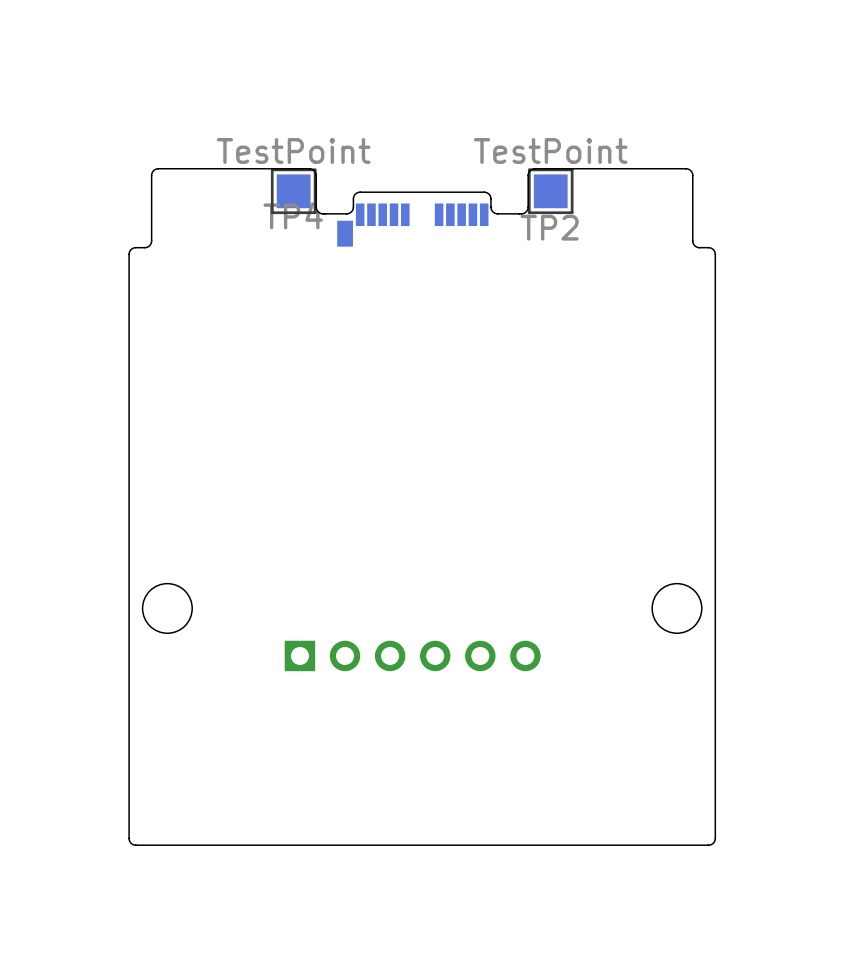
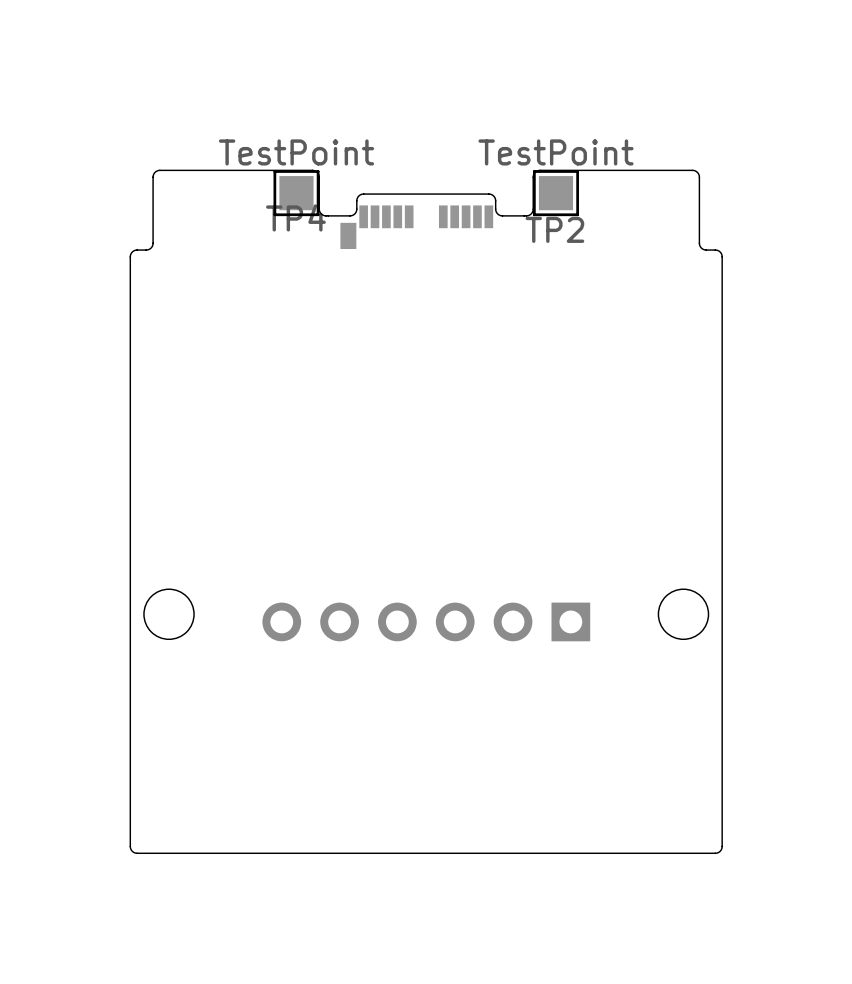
part: none -> (426, 621)
part: (412, 655) -> none

